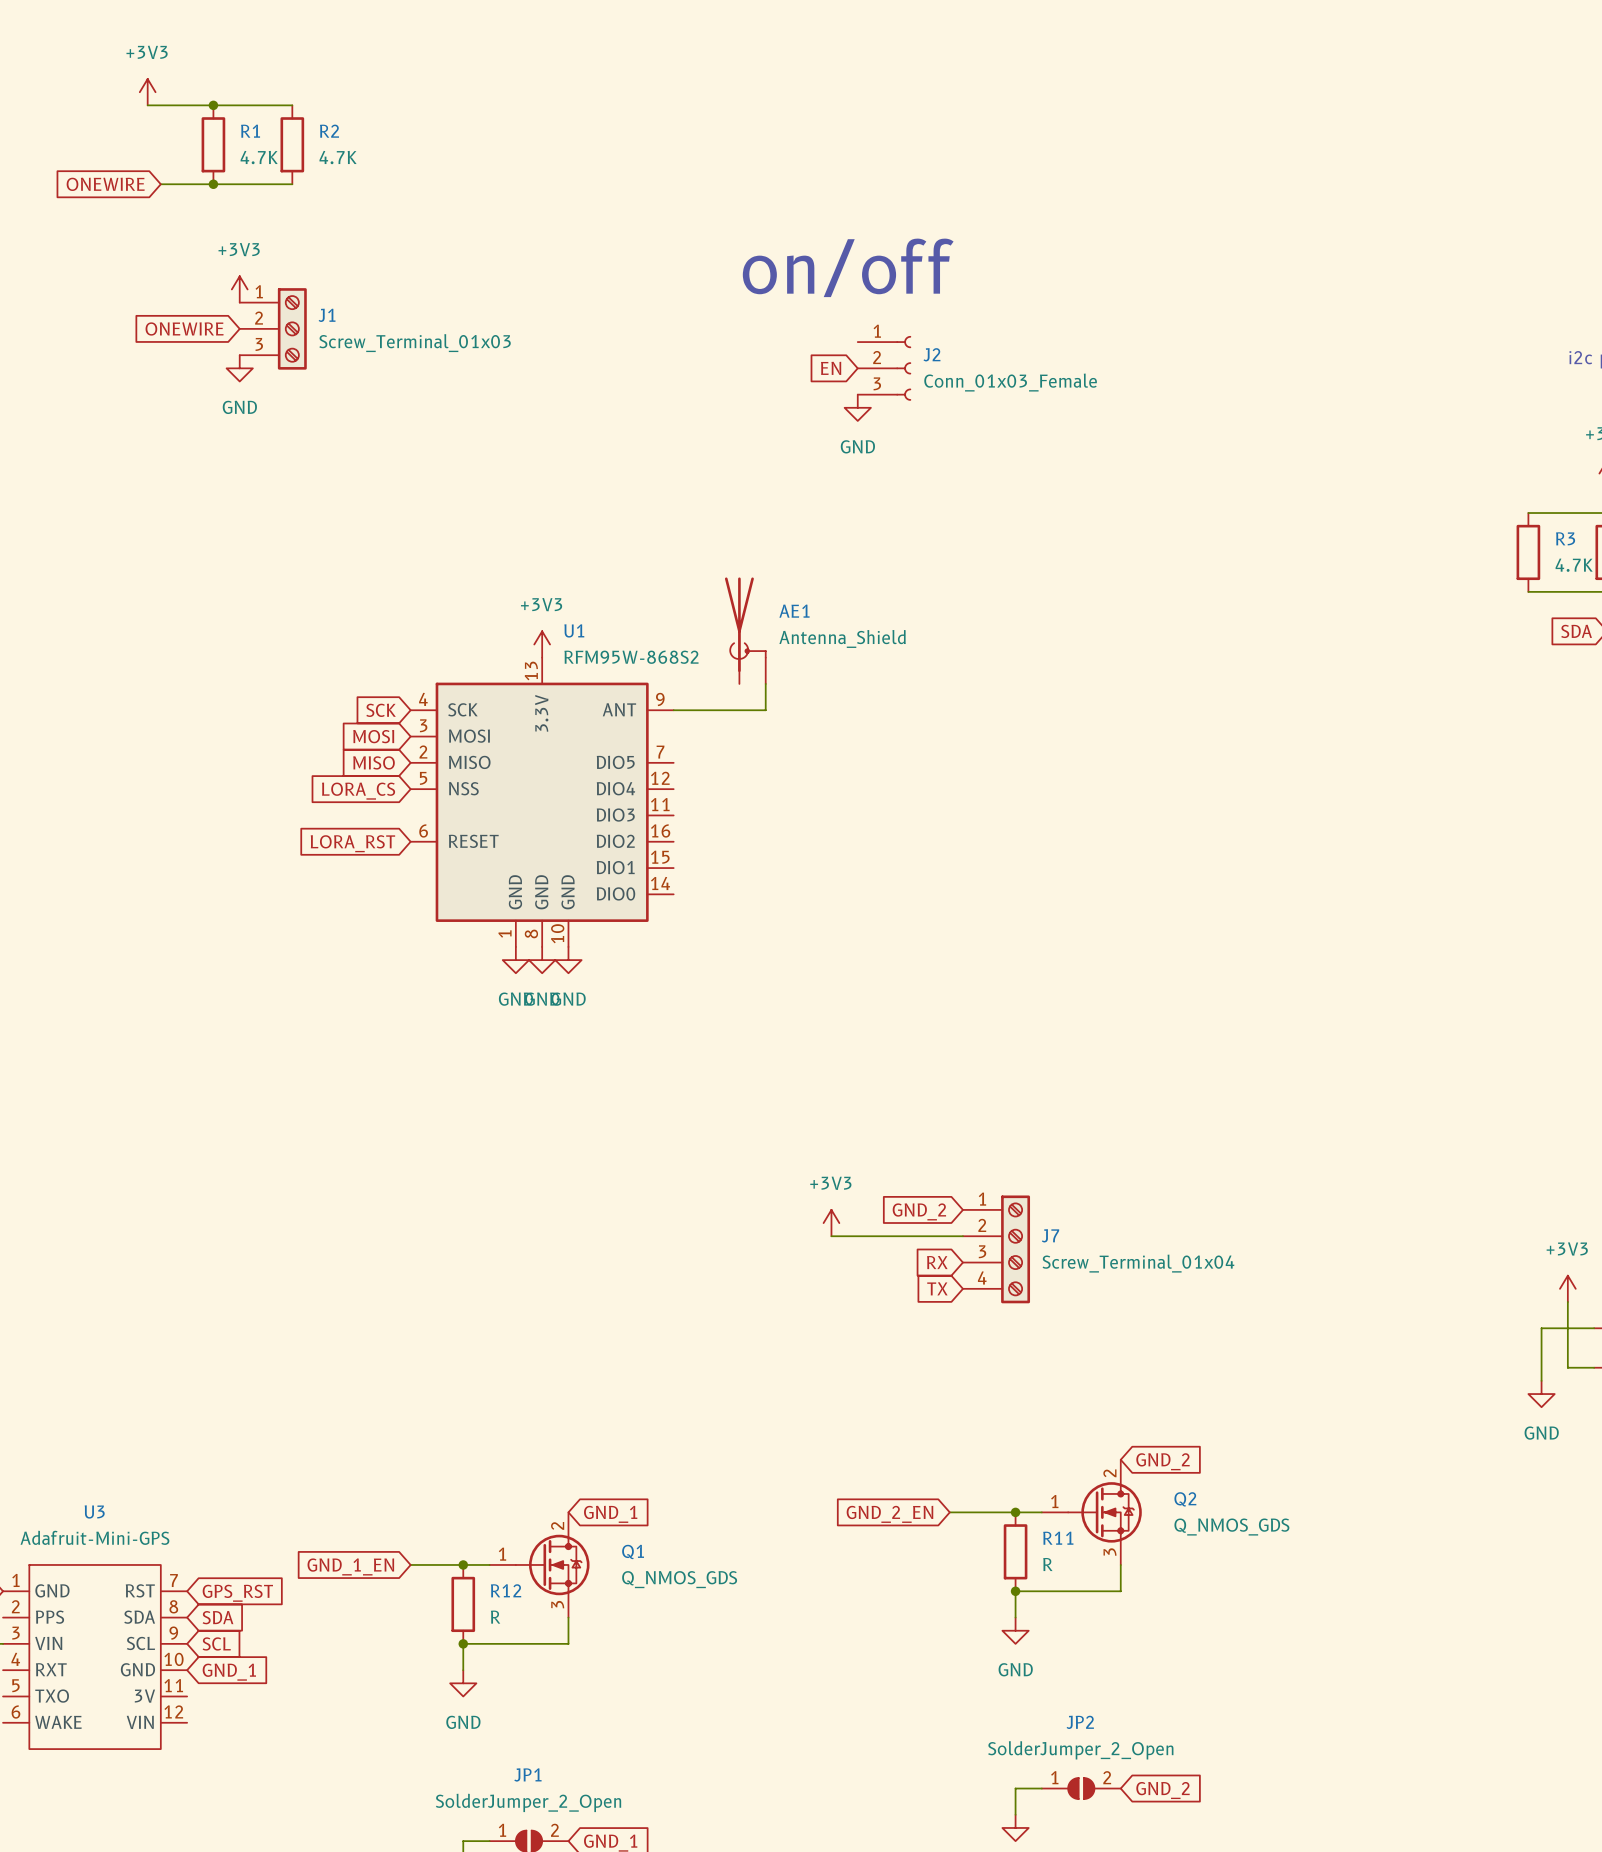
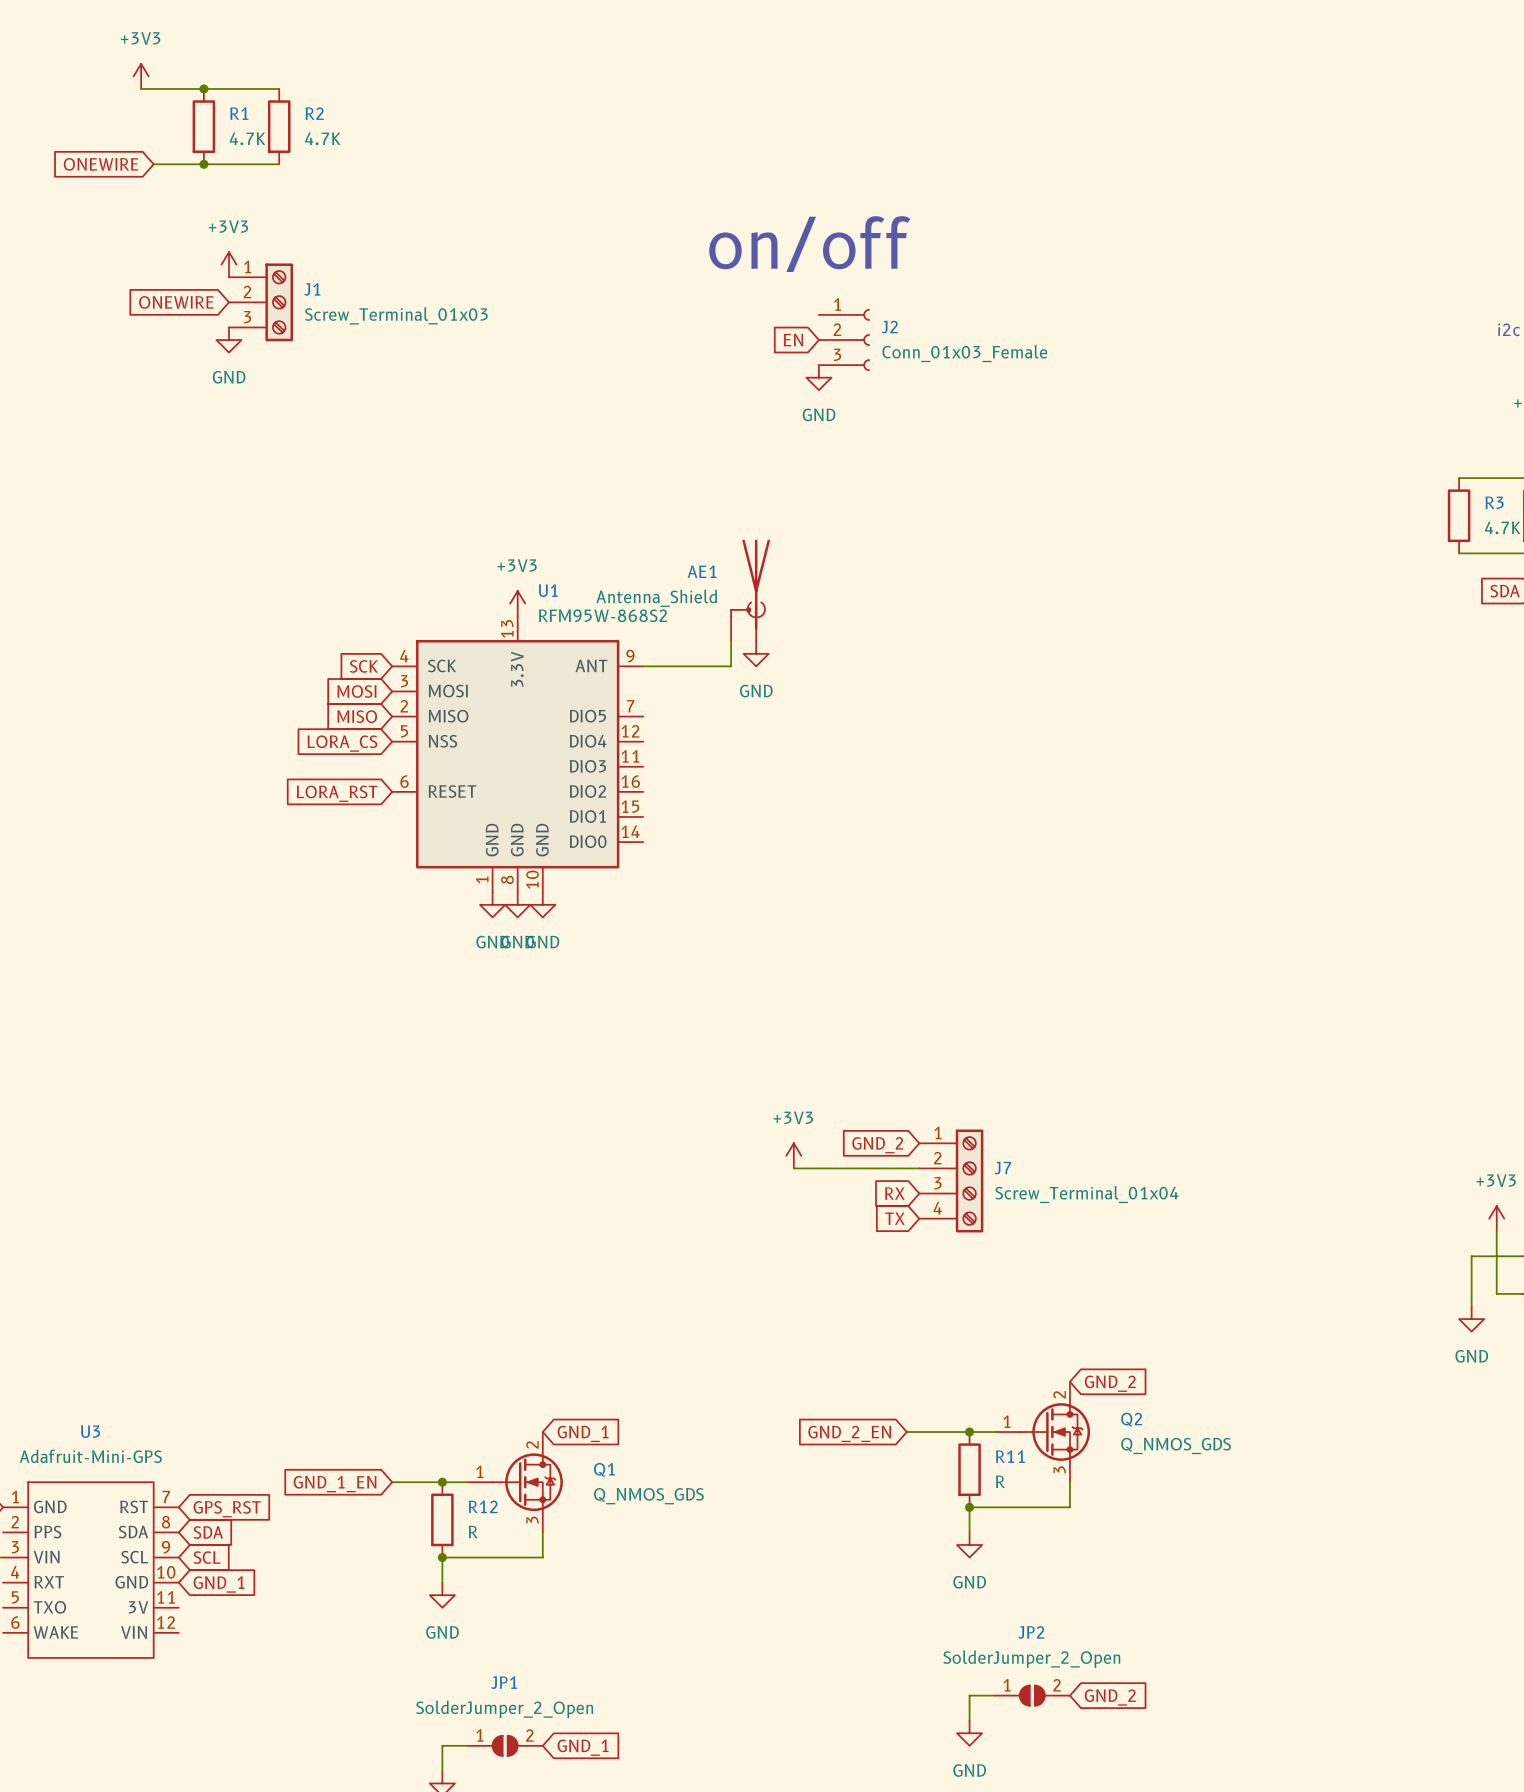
AE1 flip: as is (745, 624) -> left-right (750, 584)
power symbol: none -> GND (756, 653)

